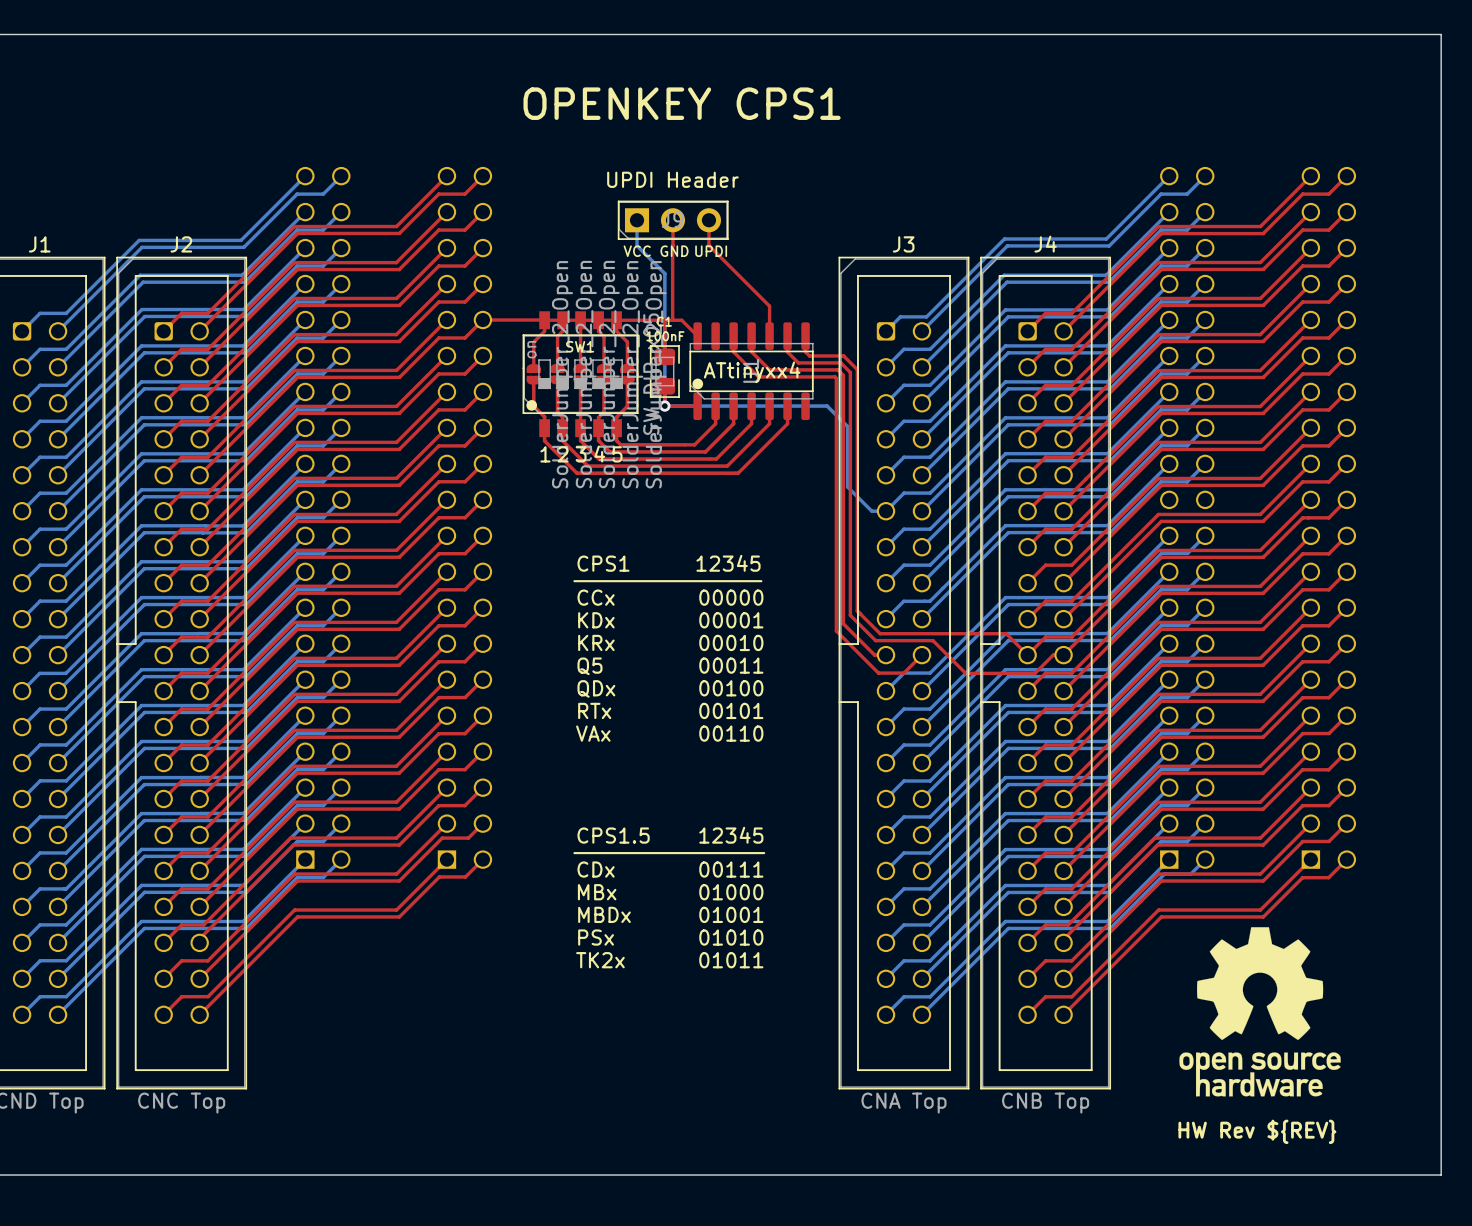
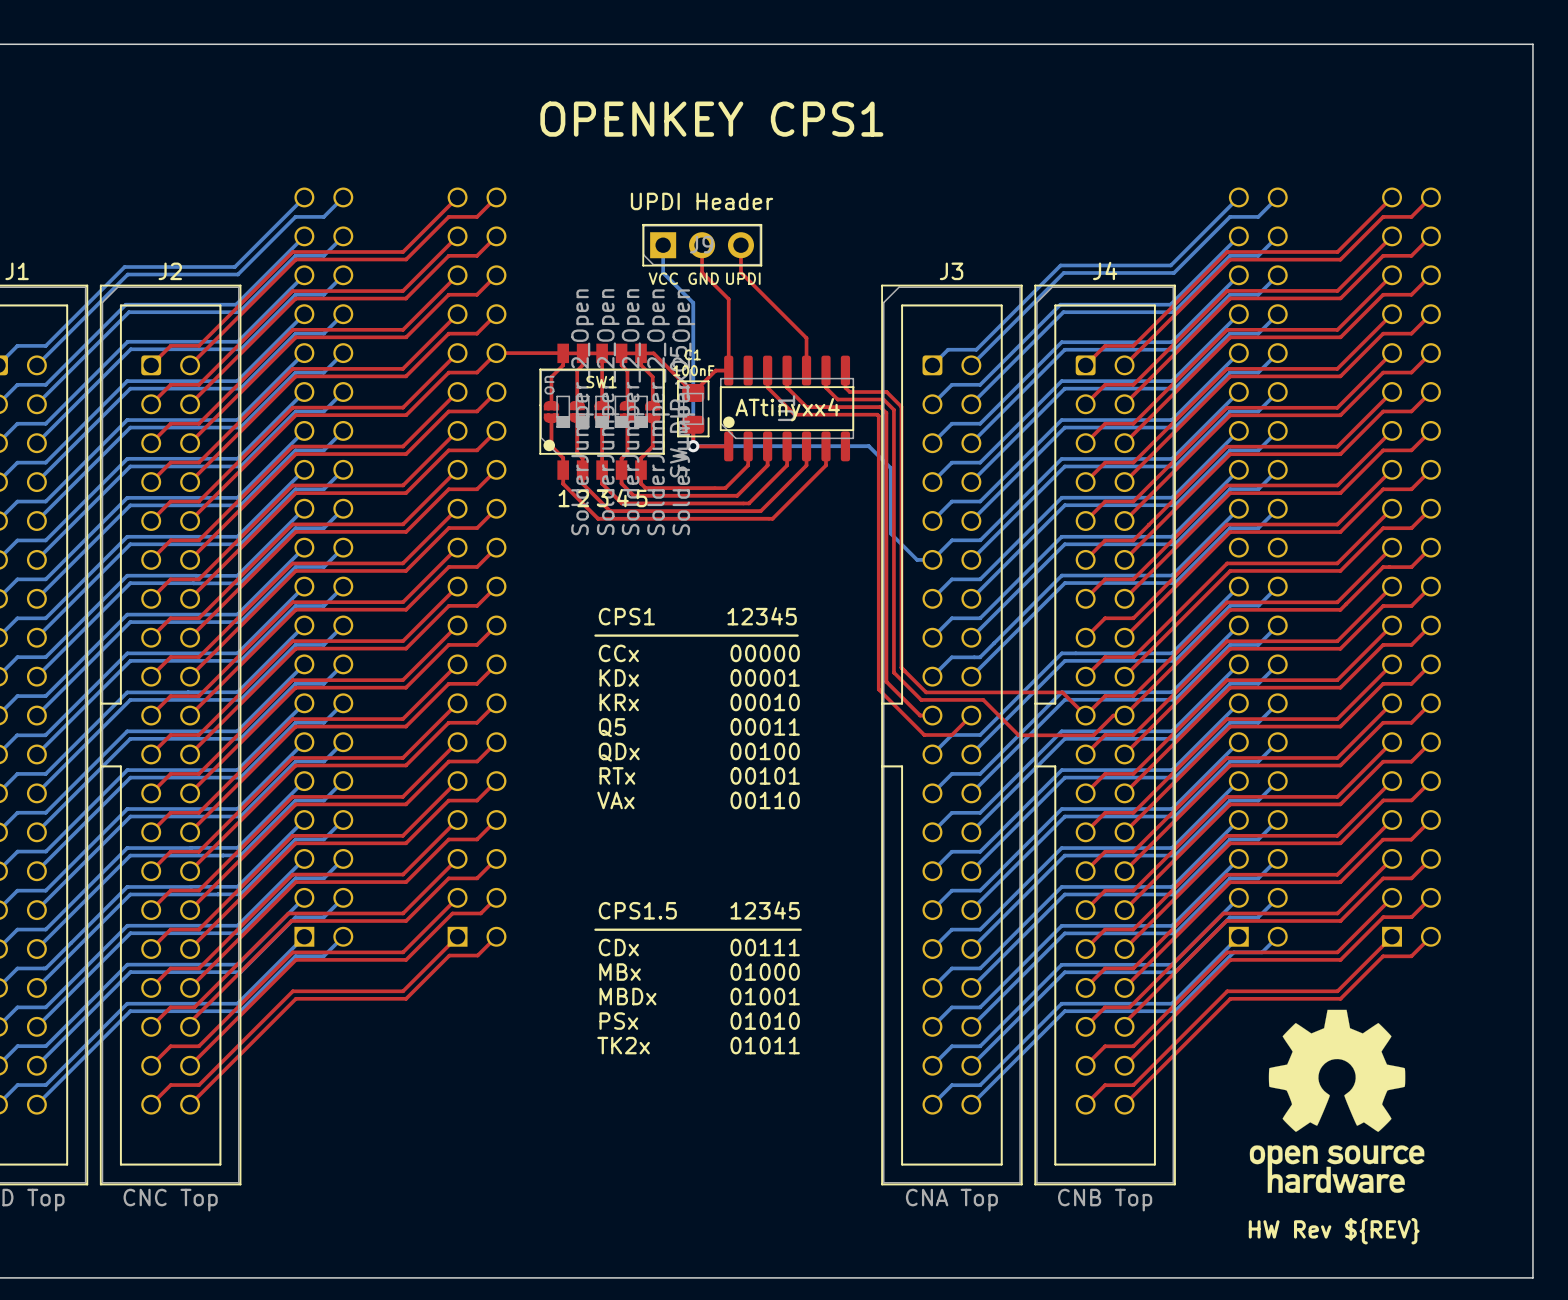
top track: (672, 245) (672, 320) -> (702, 272) (728, 299) (728, 370) (715, 370) (693, 392) (653, 353)
top track: (628, 320) (681, 320) (697, 336) -> none
top track: (663, 320) (664, 356) -> none

